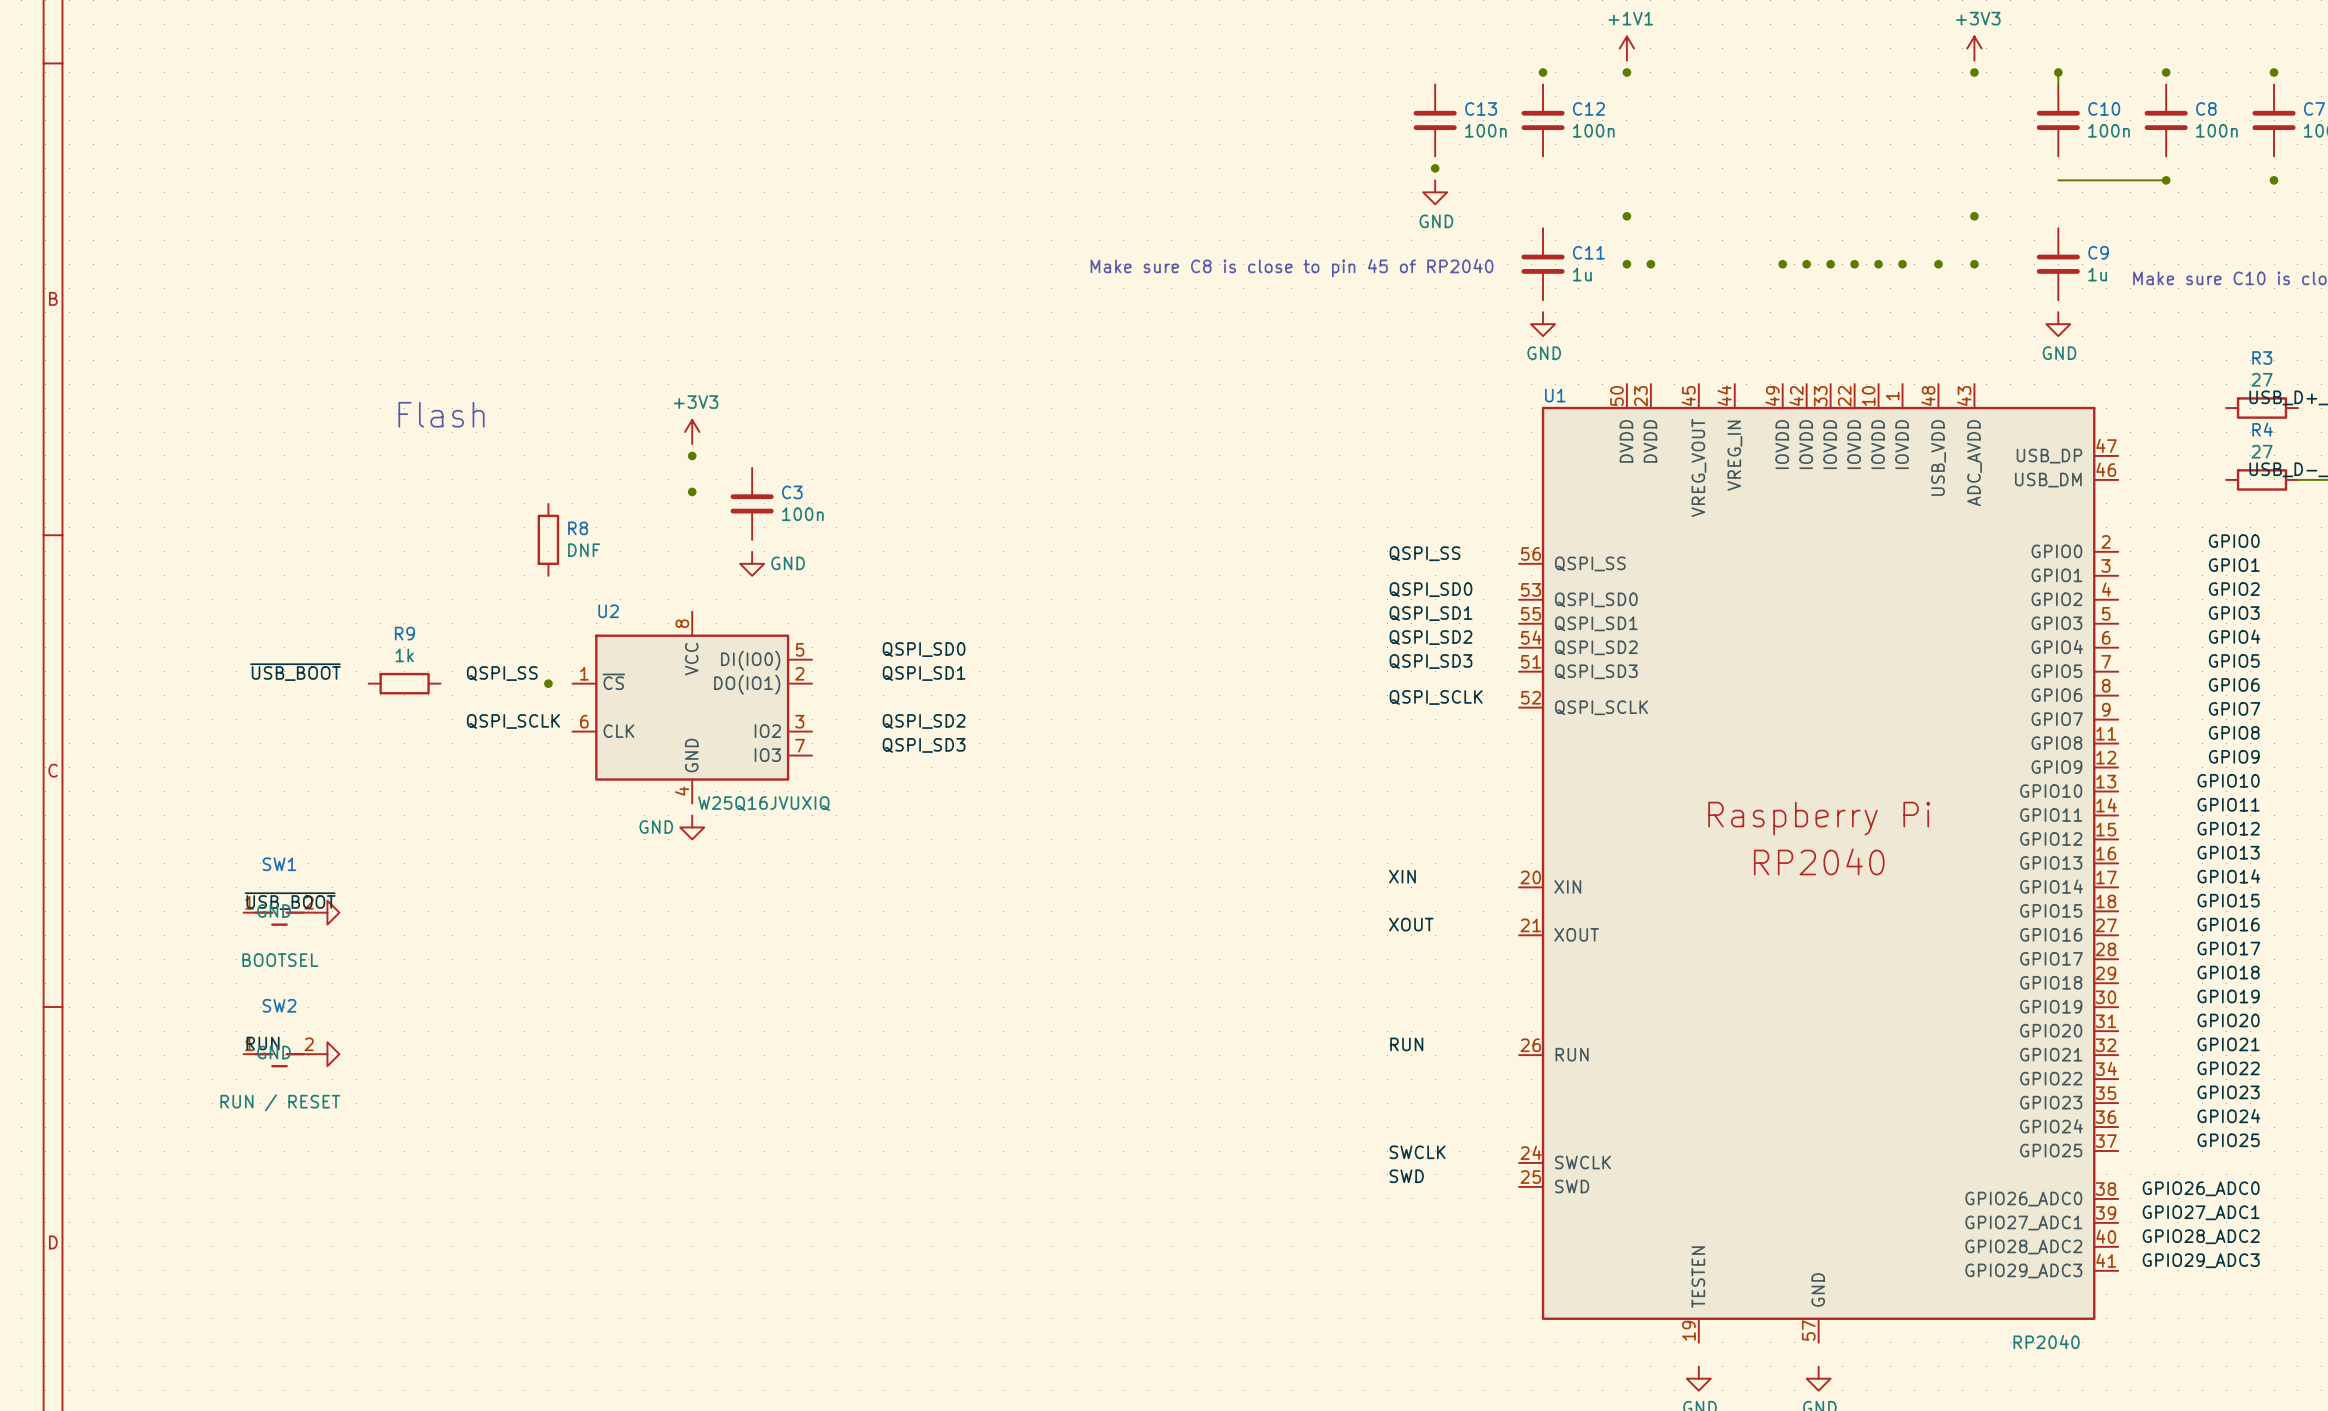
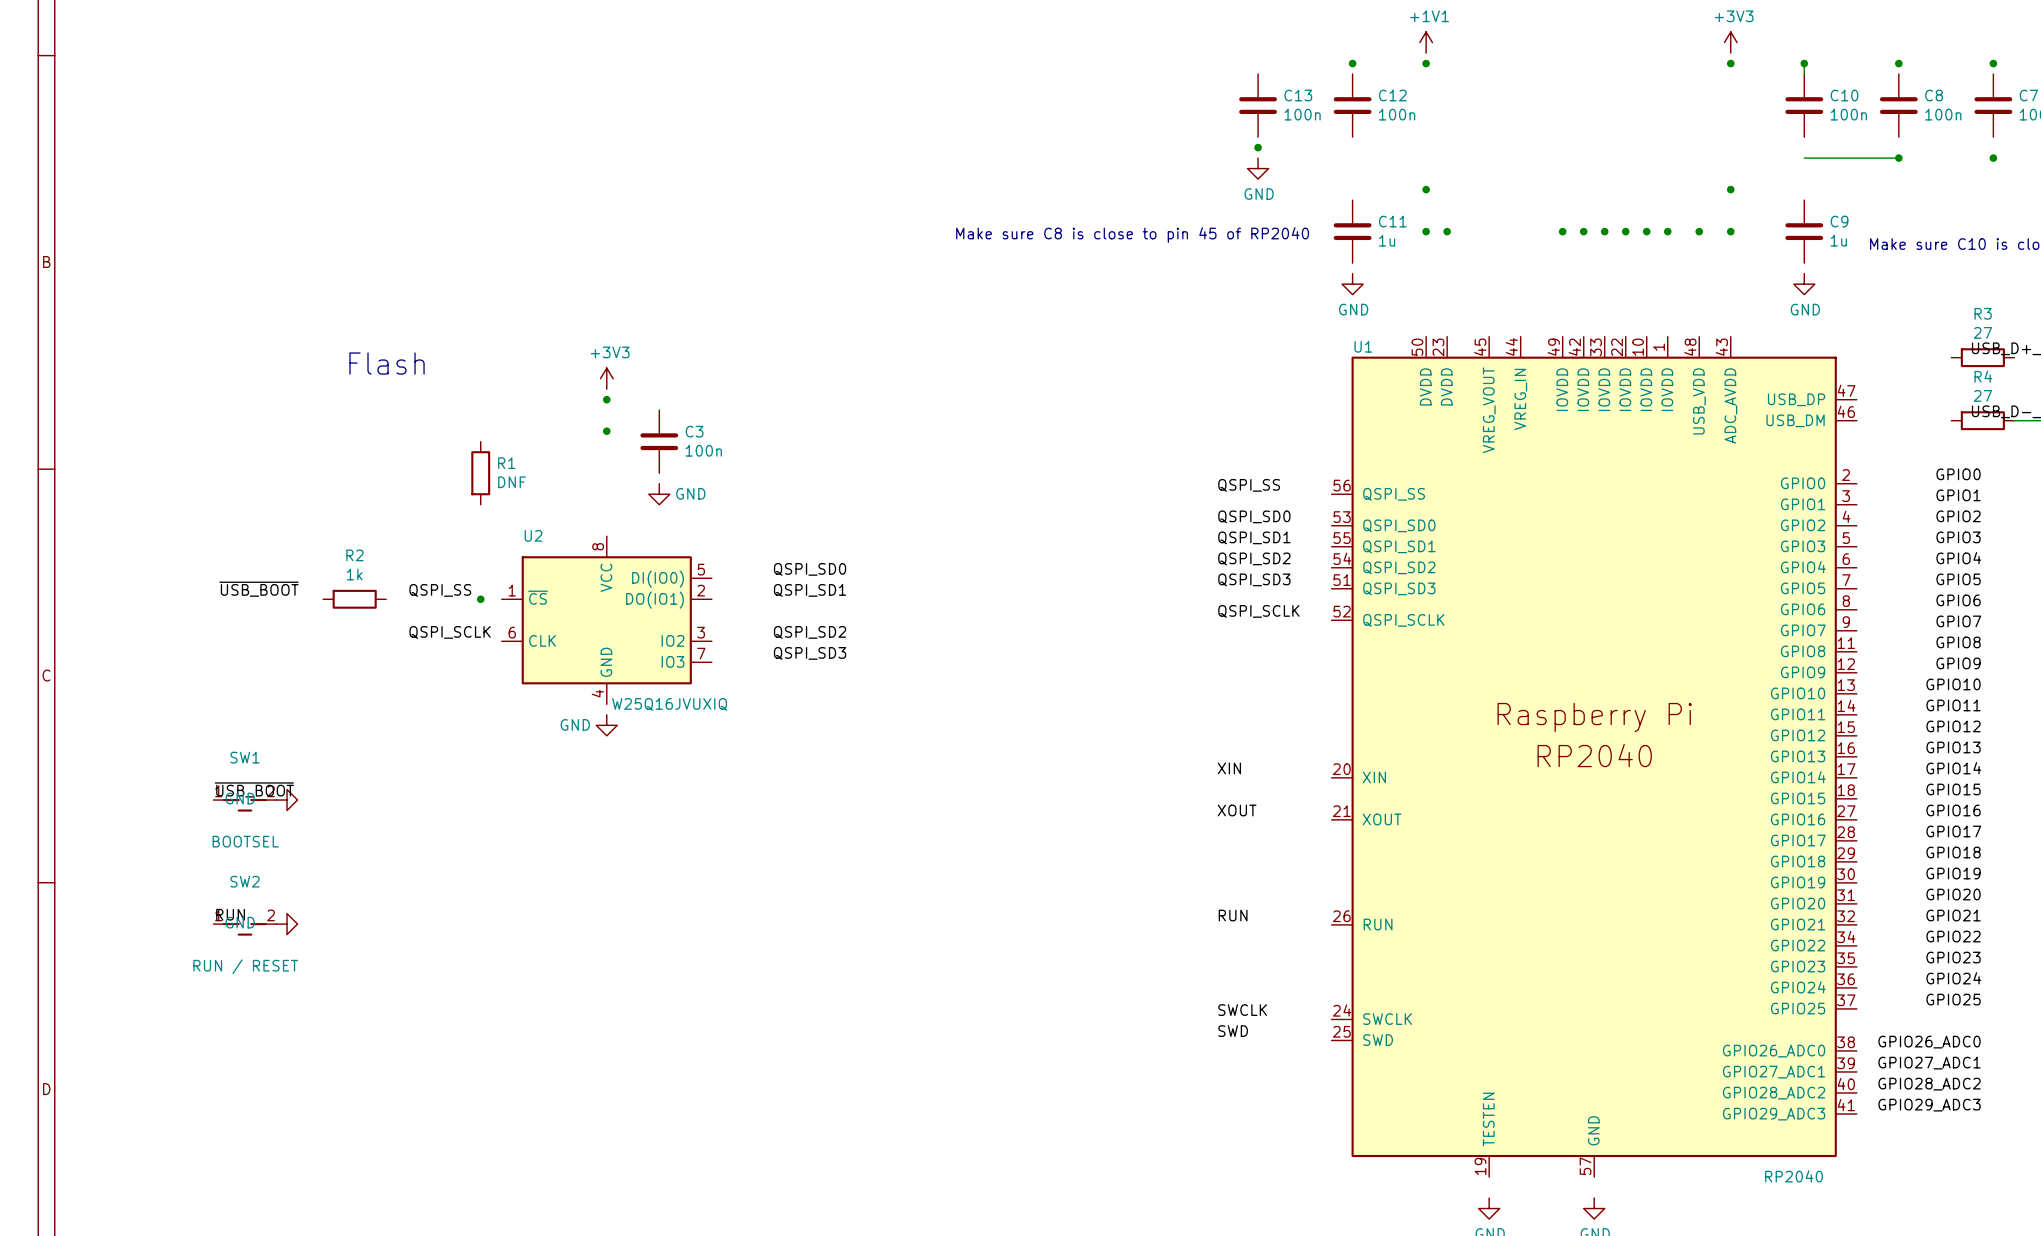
R8 name: R8 (578, 528) -> R1 (506, 463)
R9 name: R9 (404, 633) -> R2 (354, 555)

